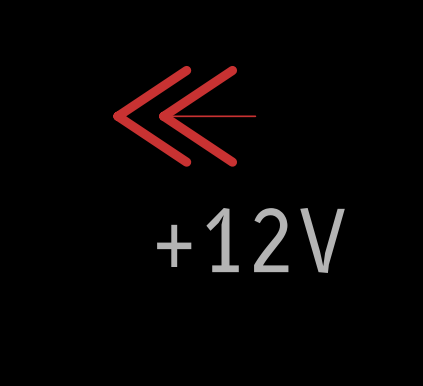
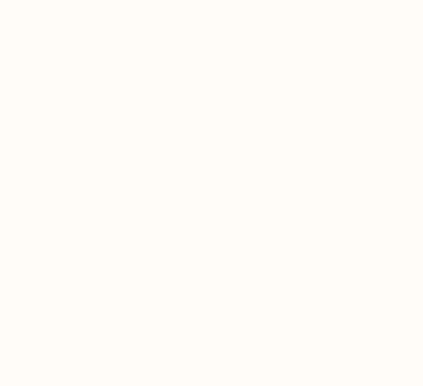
power symbol: +12V (184, 116) -> none

